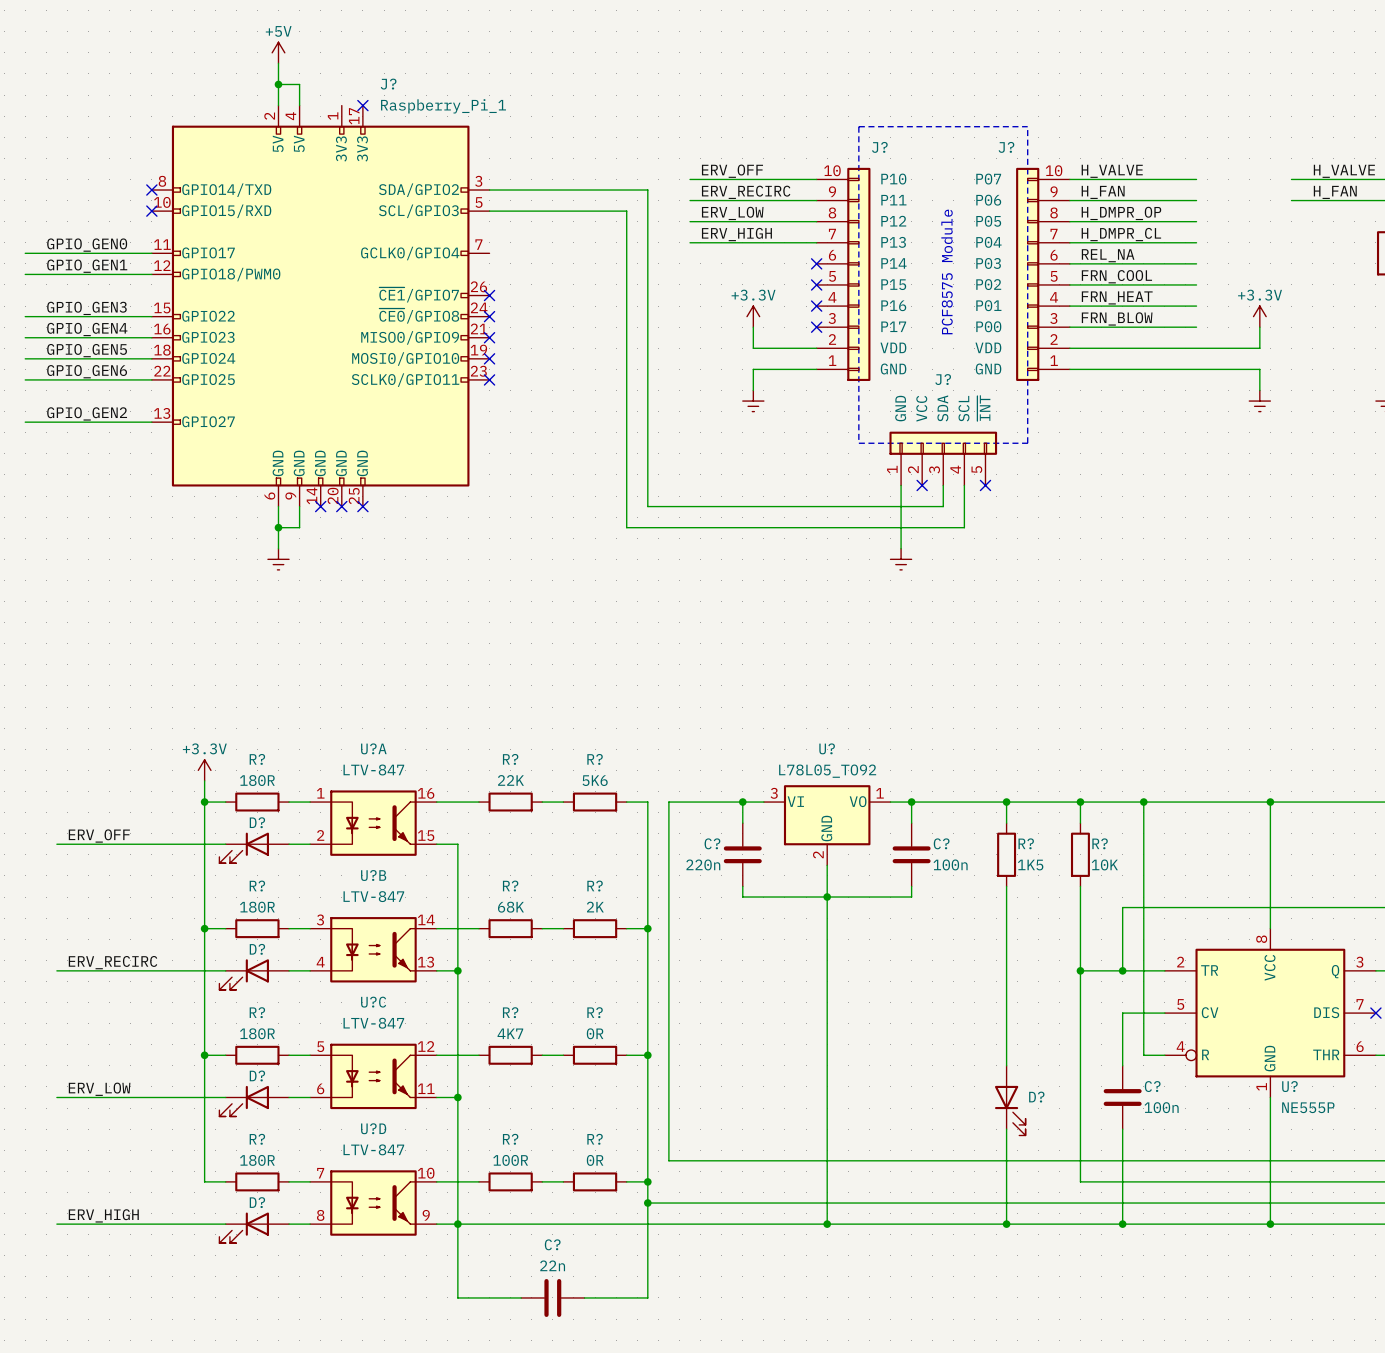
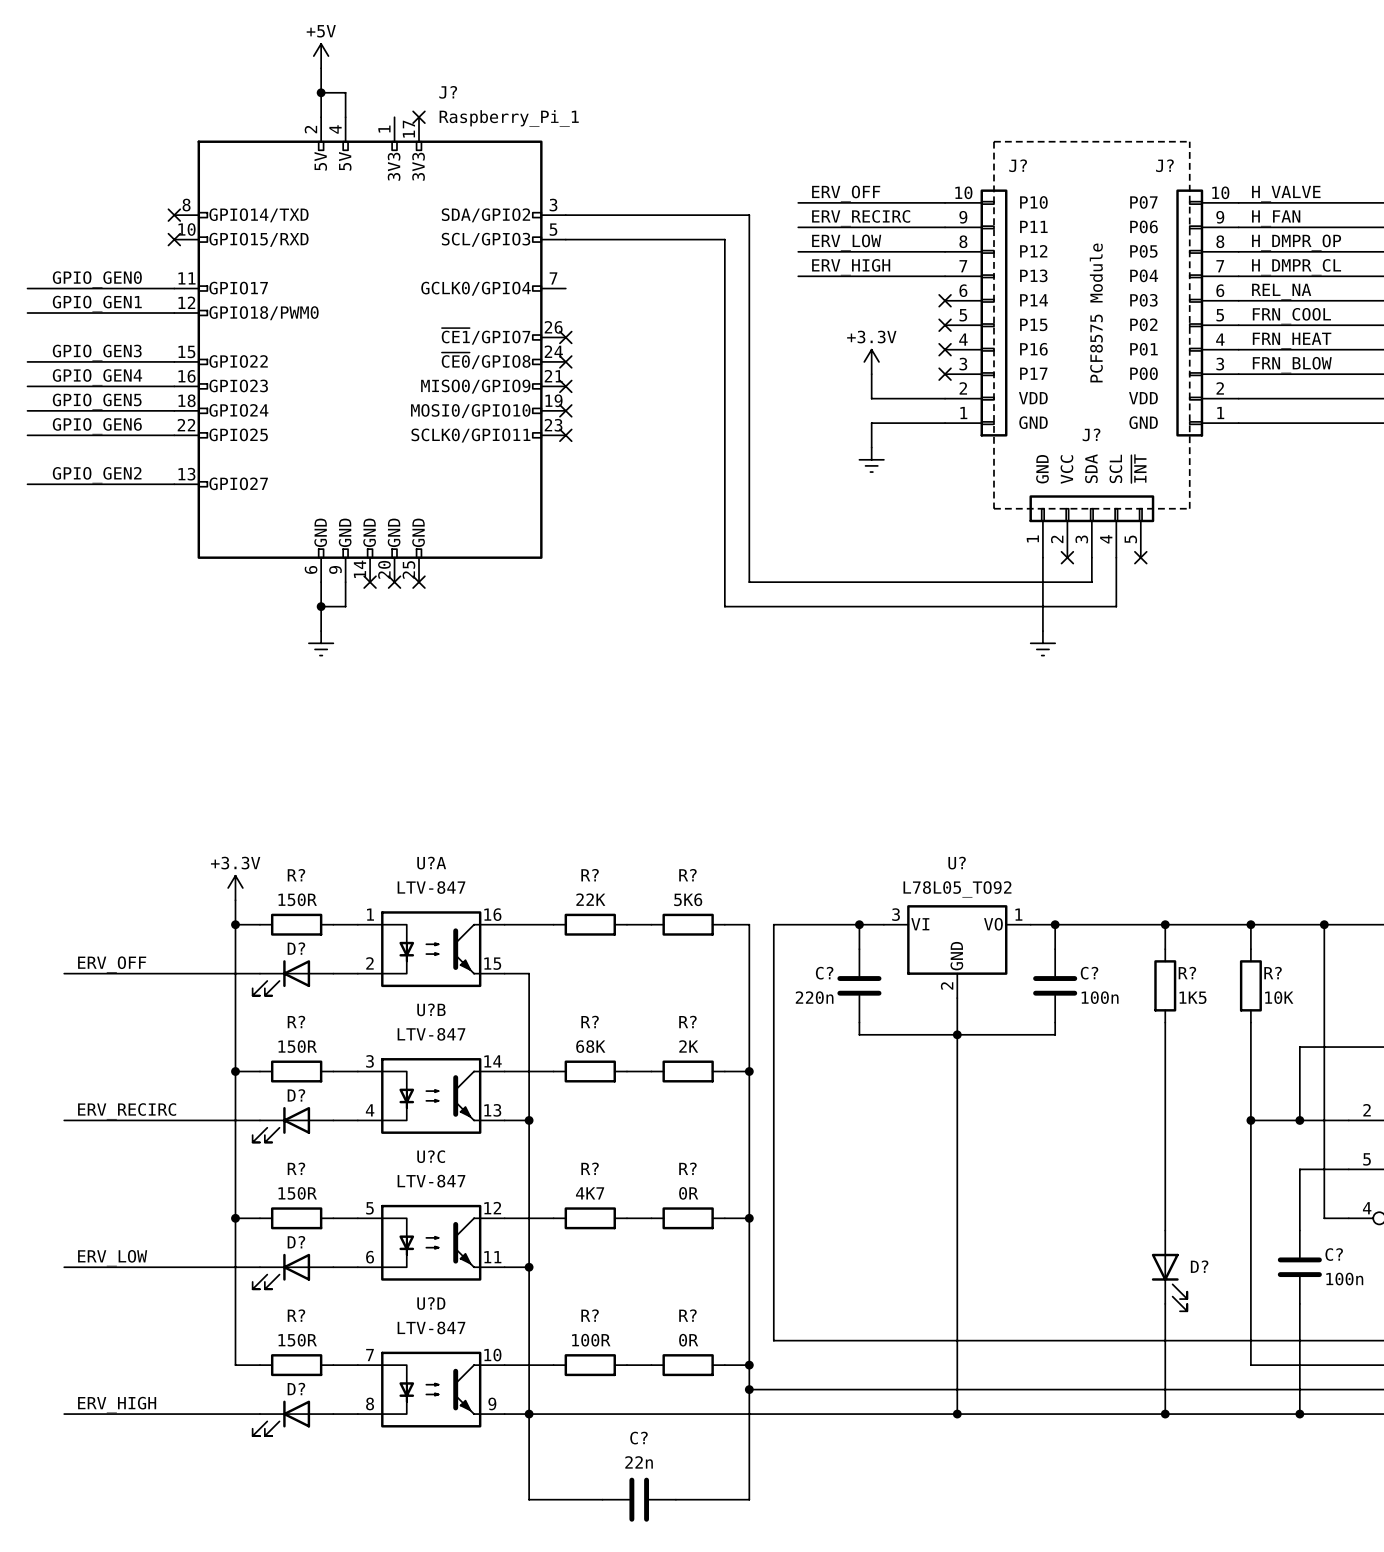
R? value: 180R (257, 780) -> 150R (297, 899)
R? value: 180R (257, 907) -> 150R (297, 1046)
R? value: 180R (257, 1033) -> 150R (297, 1193)
R? value: 180R (257, 1160) -> 150R (297, 1340)

